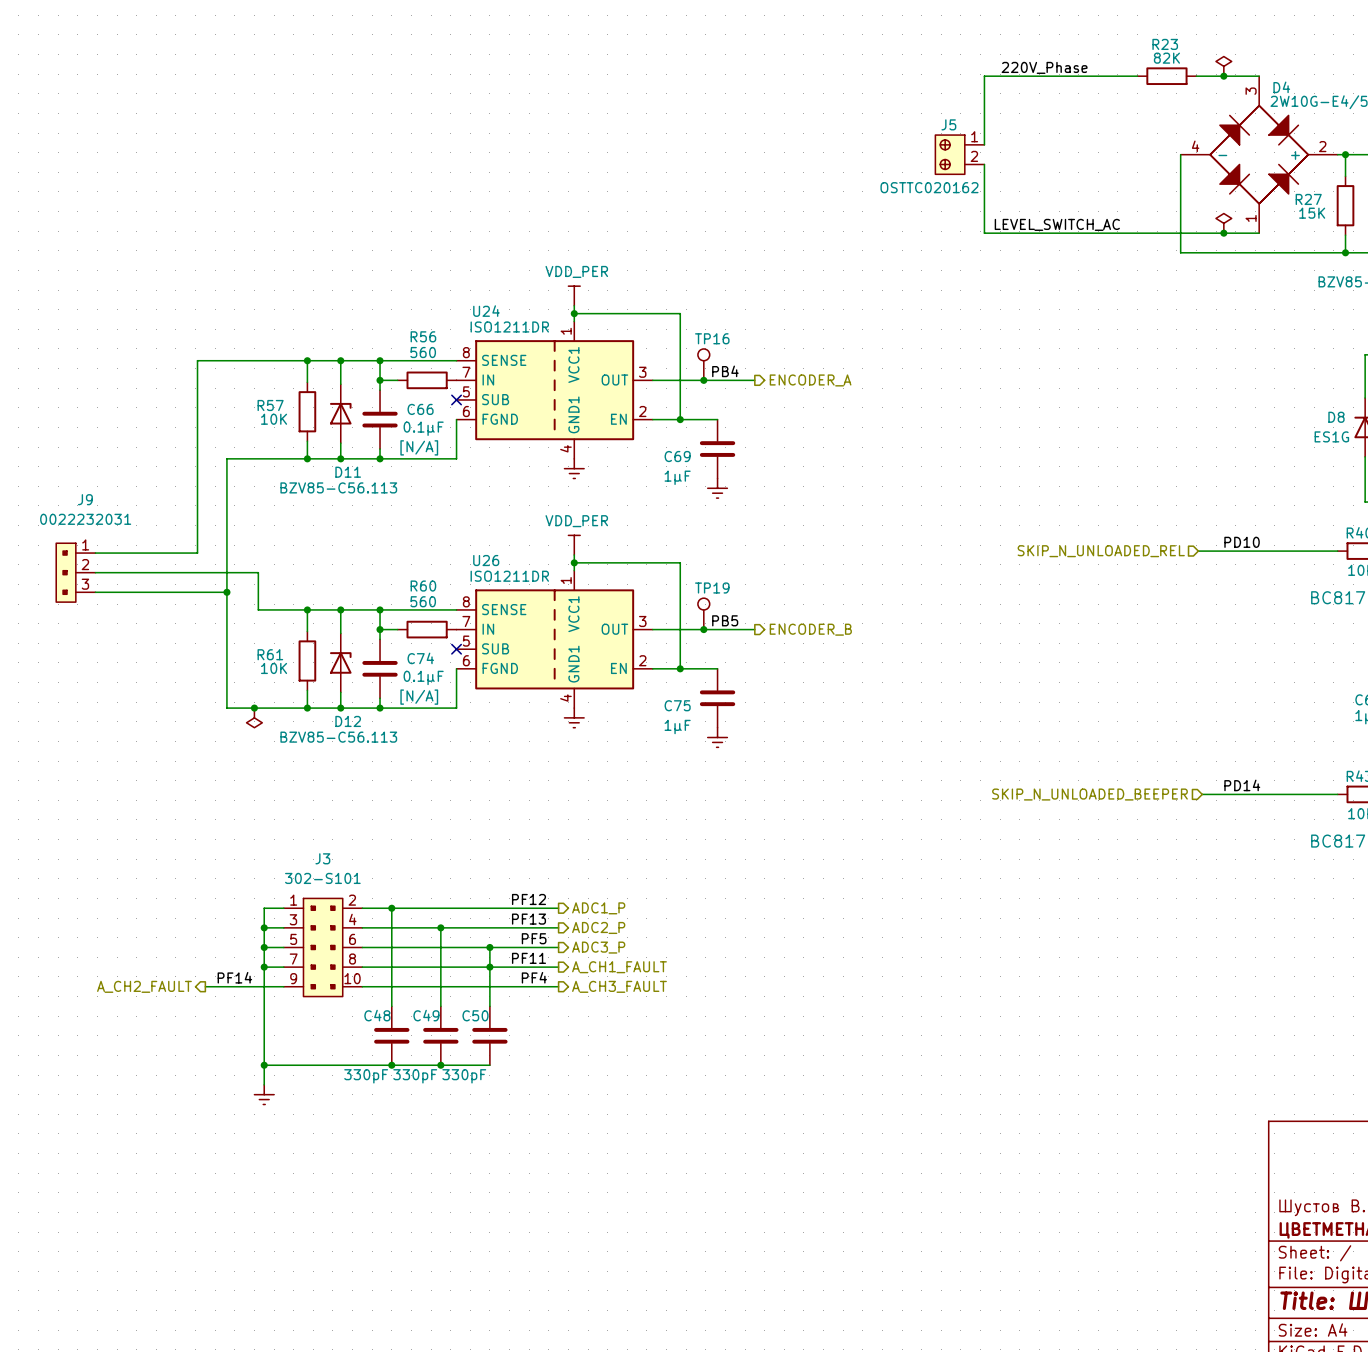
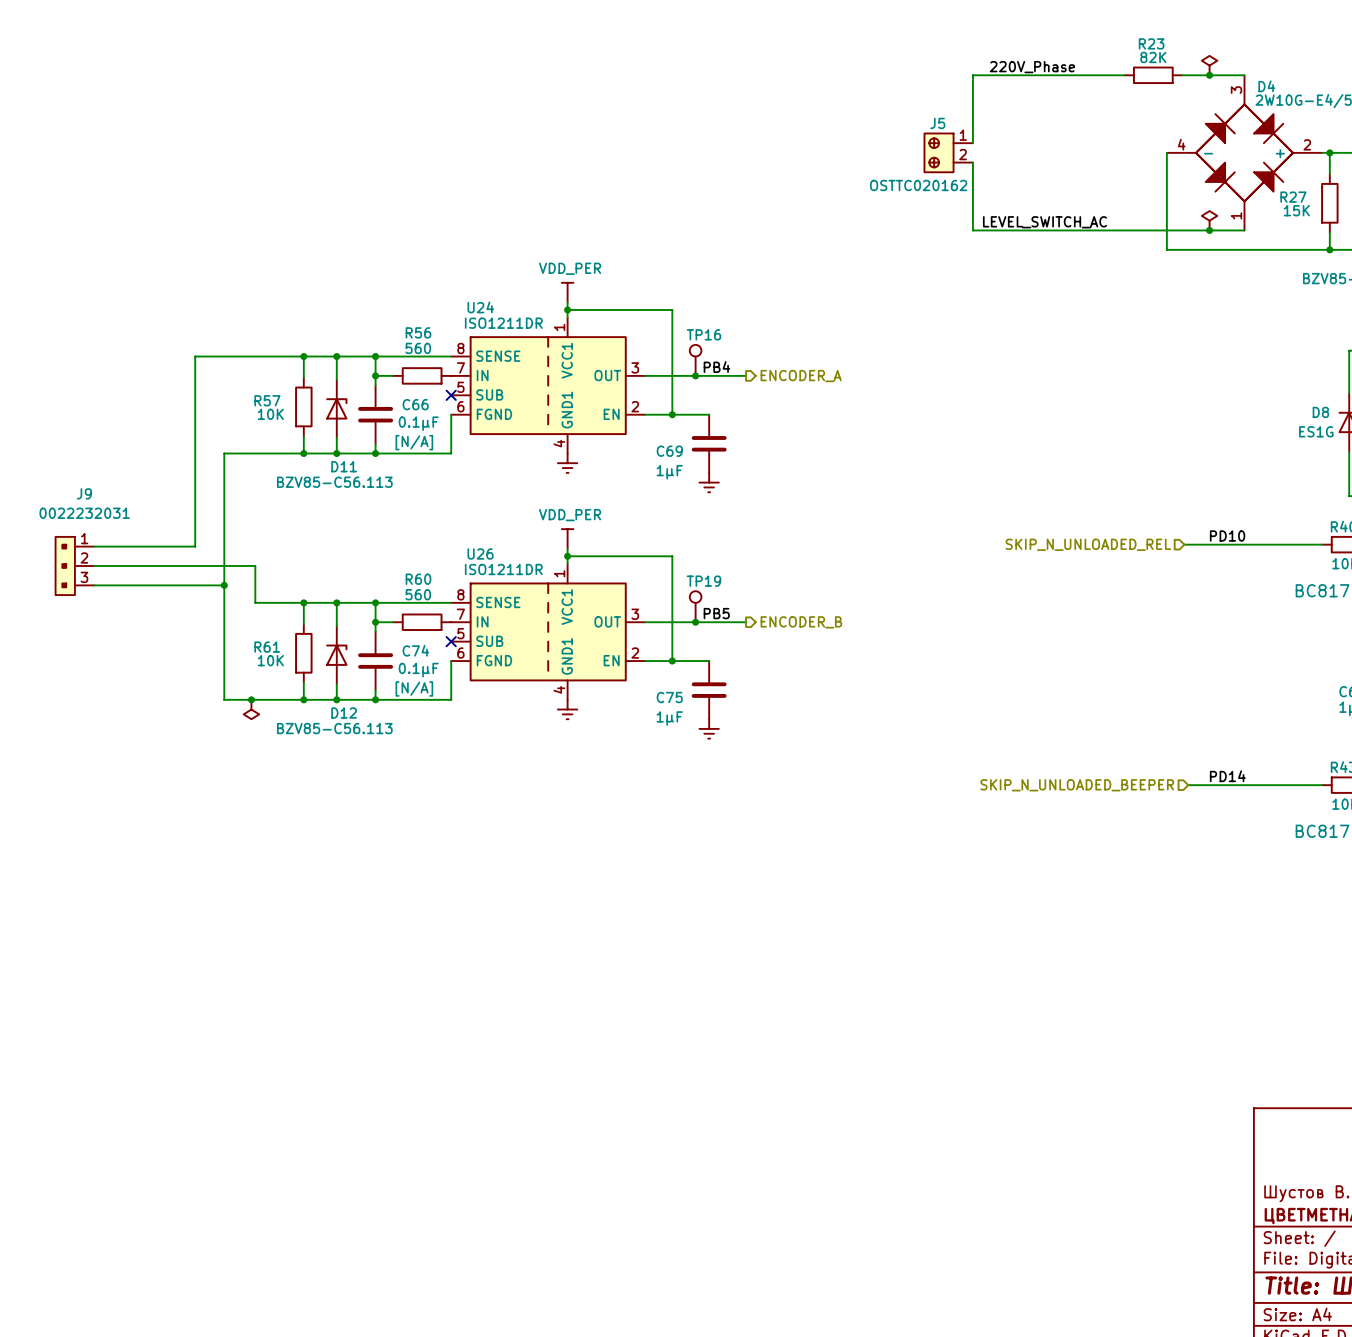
label: PF12 (528, 899) -> none
wire: (283, 908) (264, 908) (264, 1084) -> none
wire: (362, 908) (558, 908) -> none
wire: (391, 908) (391, 1006) -> none
junction: (391, 908) -> none
hierarchical label: ADC1_P (598, 908) -> none
label: PF13 (528, 919) -> none
wire: (264, 927) (283, 927) -> none
junction: (264, 927) -> none
wire: (362, 927) (558, 927) -> none
wire: (440, 927) (440, 1006) -> none
junction: (440, 927) -> none
hierarchical label: ADC2_P (598, 927) -> none
label: PF5 (534, 938) -> none
wire: (264, 947) (283, 947) -> none
junction: (264, 947) -> none
J3: 302-S101 (323, 947) -> none
wire: (362, 947) (558, 947) -> none
wire: (489, 947) (489, 1006) -> none
junction: (489, 947) -> none
hierarchical label: ADC3_P (598, 947) -> none
label: PF11 (528, 958) -> none
wire: (264, 967) (283, 967) -> none
junction: (264, 967) -> none
wire: (362, 967) (558, 967) -> none
junction: (489, 967) -> none
hierarchical label: A_CH1_FAULT (619, 967) -> none
label: PF14 (234, 977) -> none
label: PF4 (534, 977) -> none
hierarchical label: A_CH2_FAULT (144, 986) -> none
wire: (205, 986) (283, 986) -> none
wire: (362, 986) (558, 986) -> none
hierarchical label: A_CH3_FAULT (619, 986) -> none
C48: 330pF (391, 1035) -> none
C49: 330pF (440, 1035) -> none
C50: 330pF (489, 1035) -> none
wire: (264, 1065) (489, 1065) -> none
junction: (264, 1065) -> none
junction: (391, 1065) -> none
junction: (440, 1065) -> none
power symbol: (264, 1094) -> none

